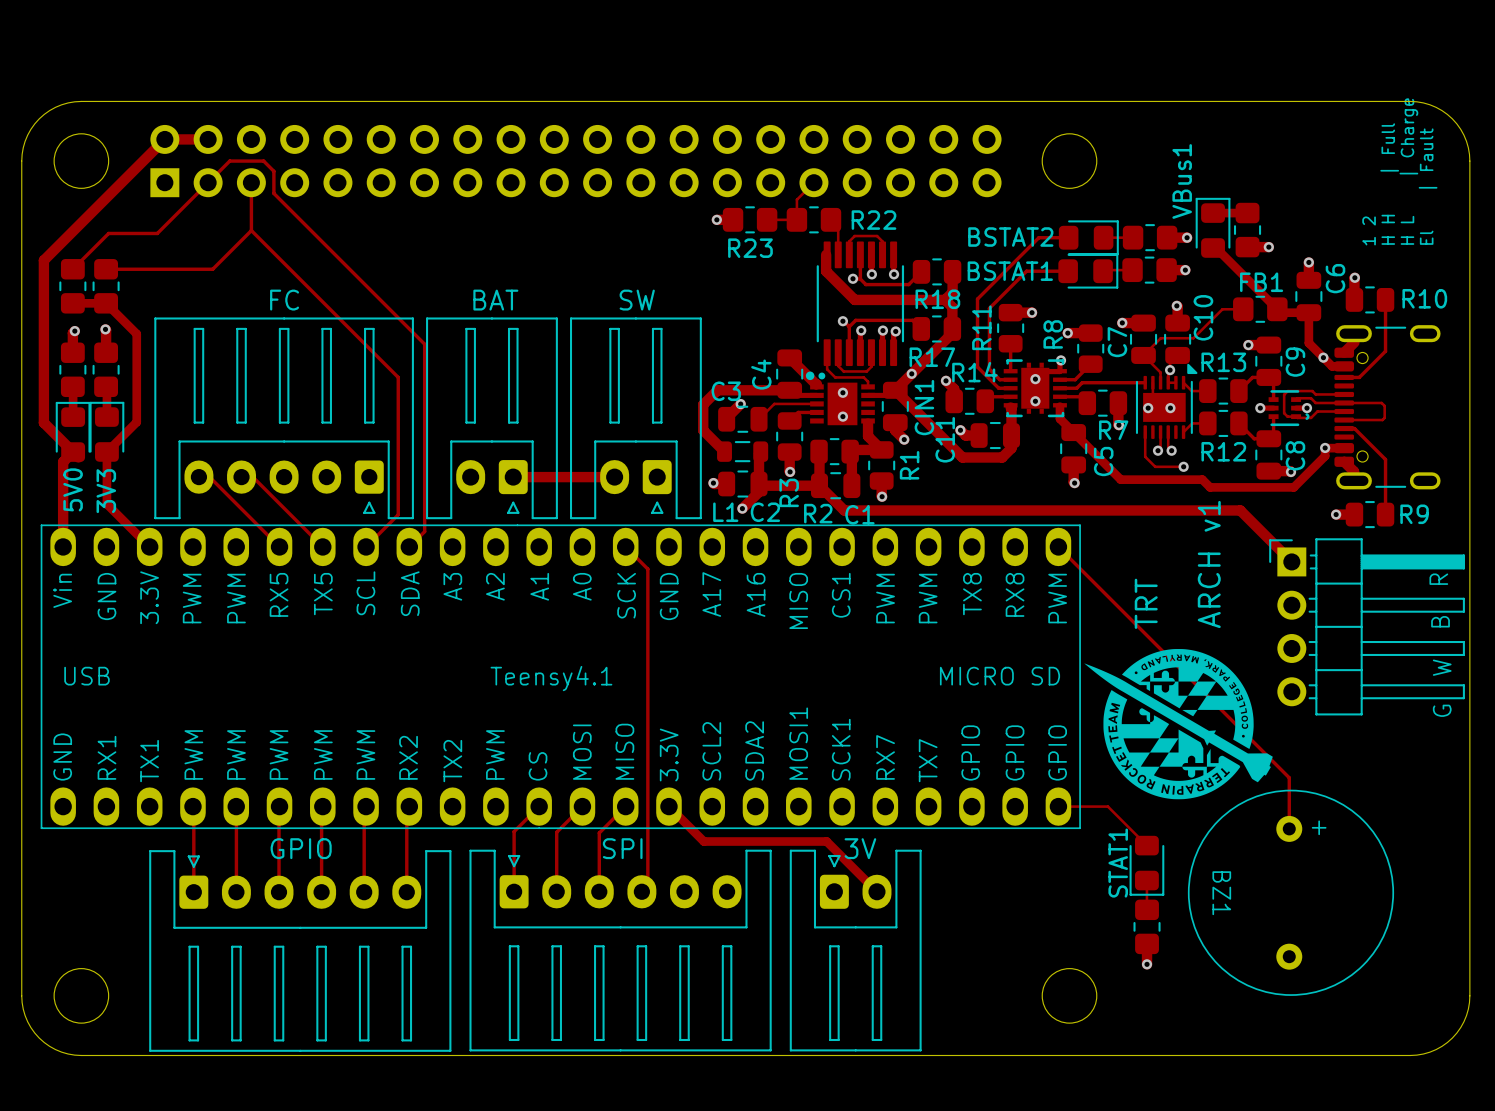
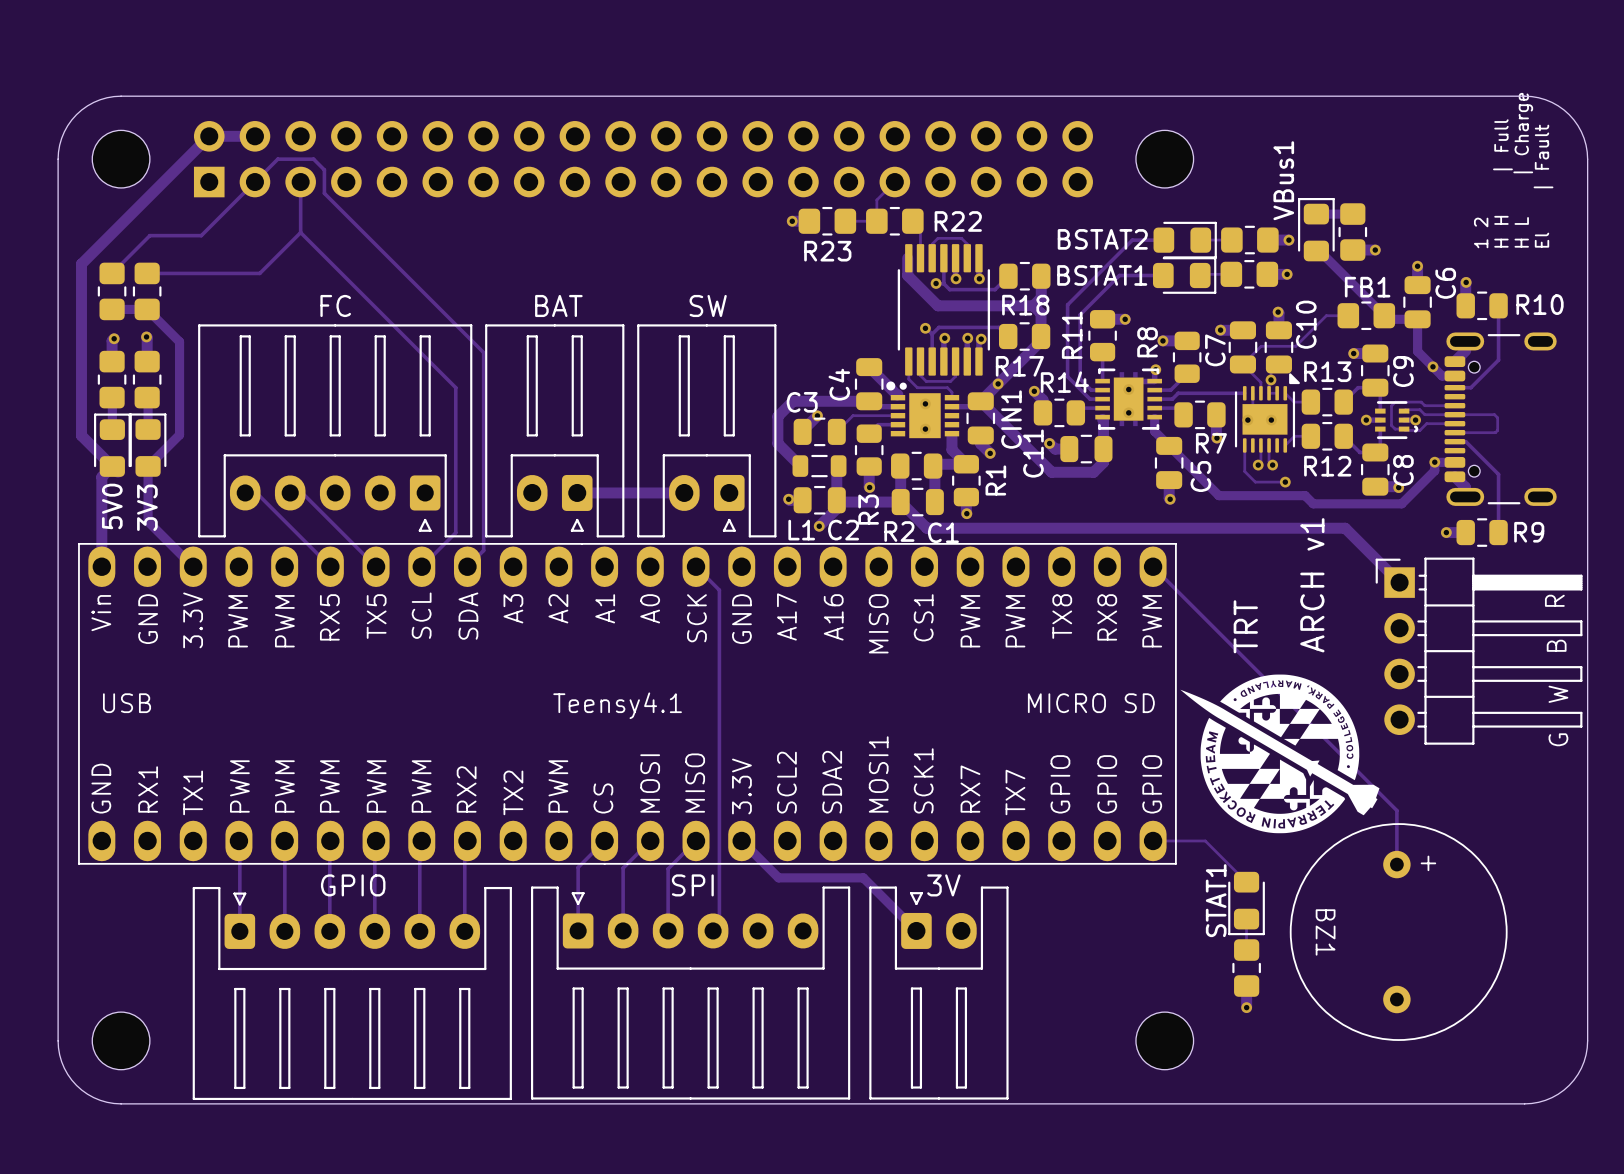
track: (784, 841) (826, 841) (876, 891) -> (863, 877) (916, 930)

